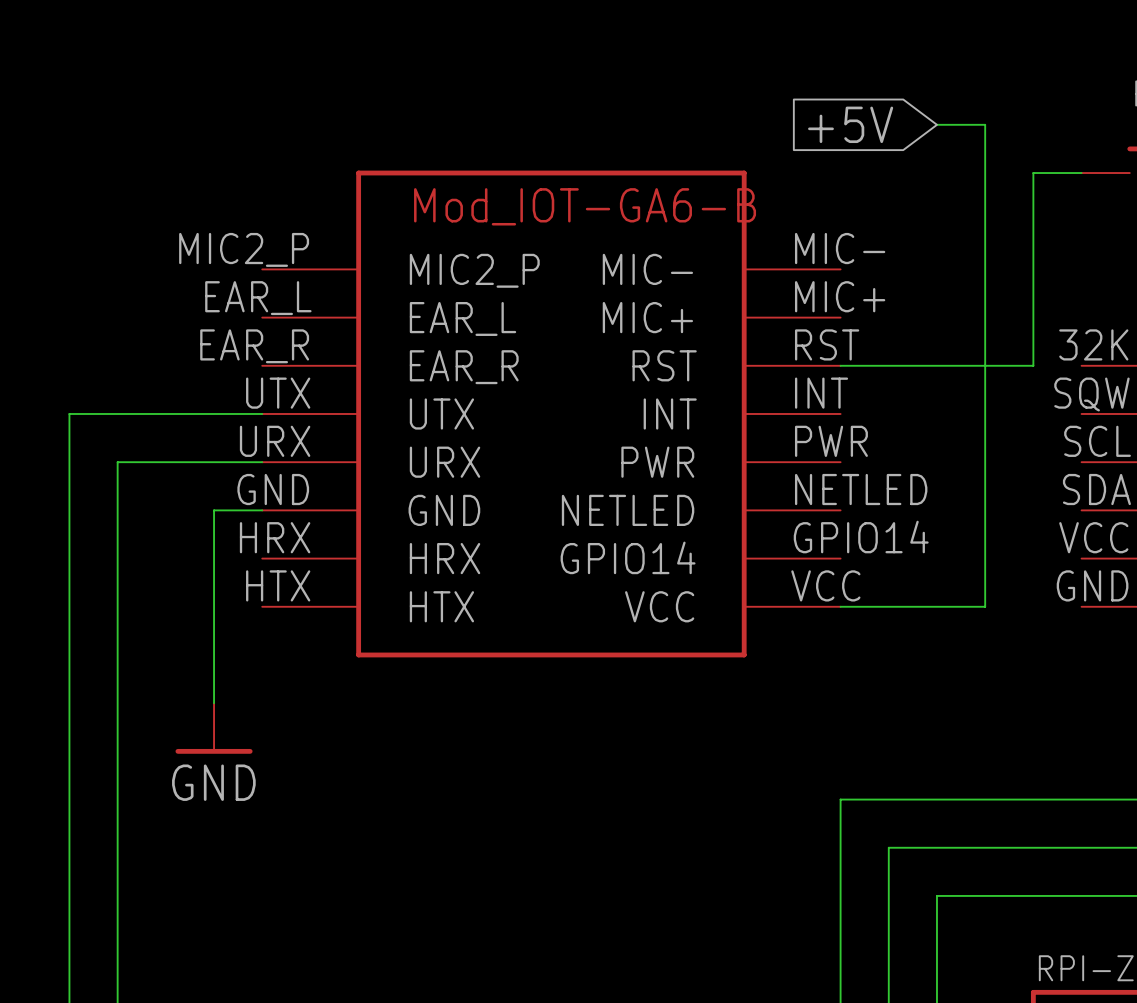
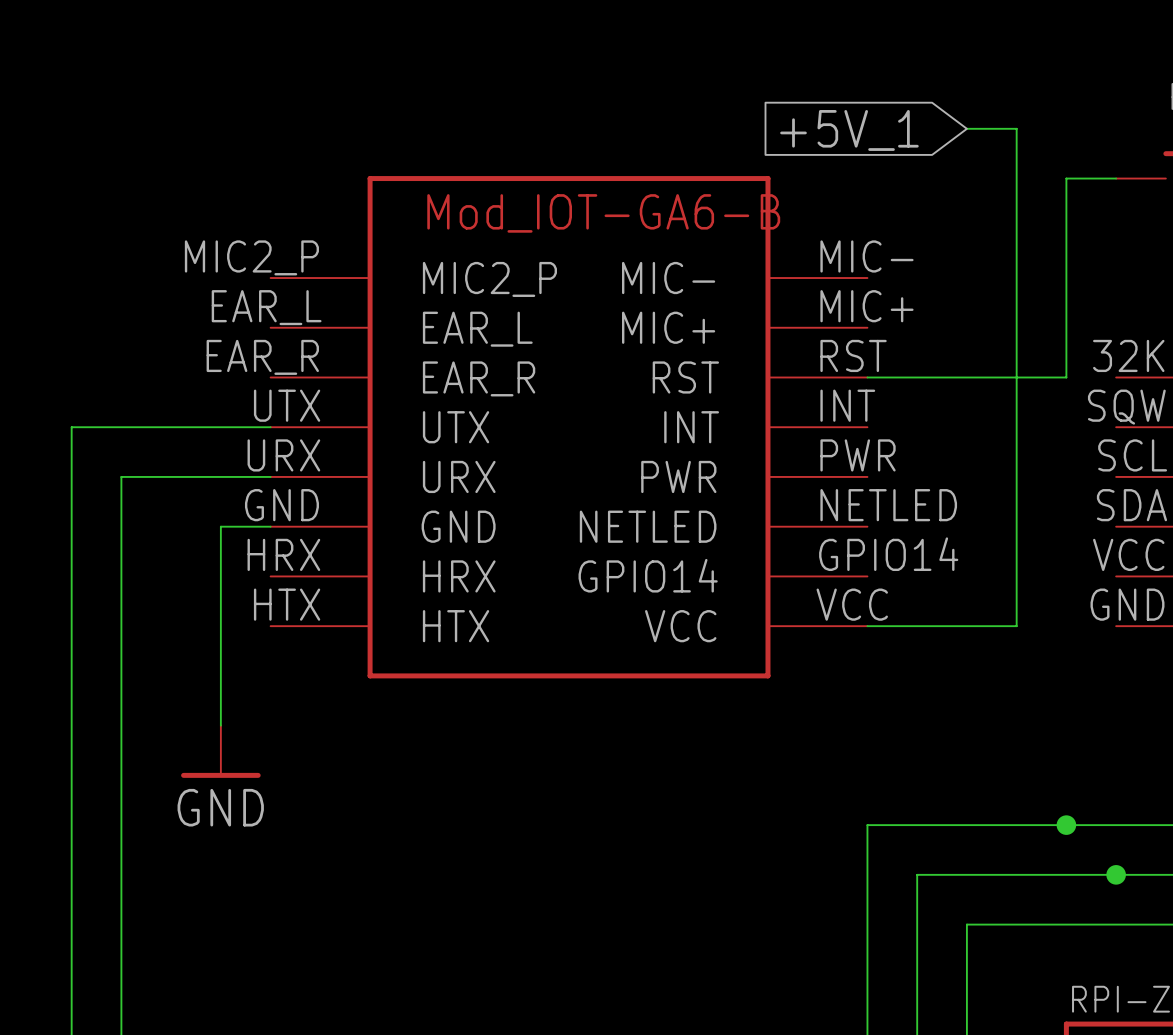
global label: +5V (850, 124) -> +5V_1 (849, 130)
junction: none -> (1066, 825)
junction: none -> (1116, 874)

